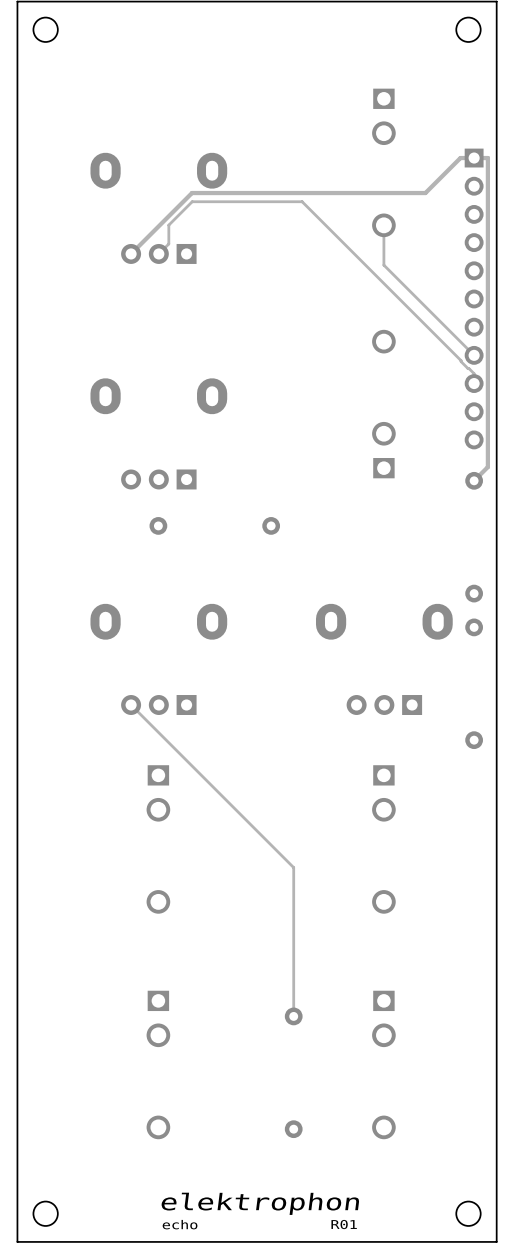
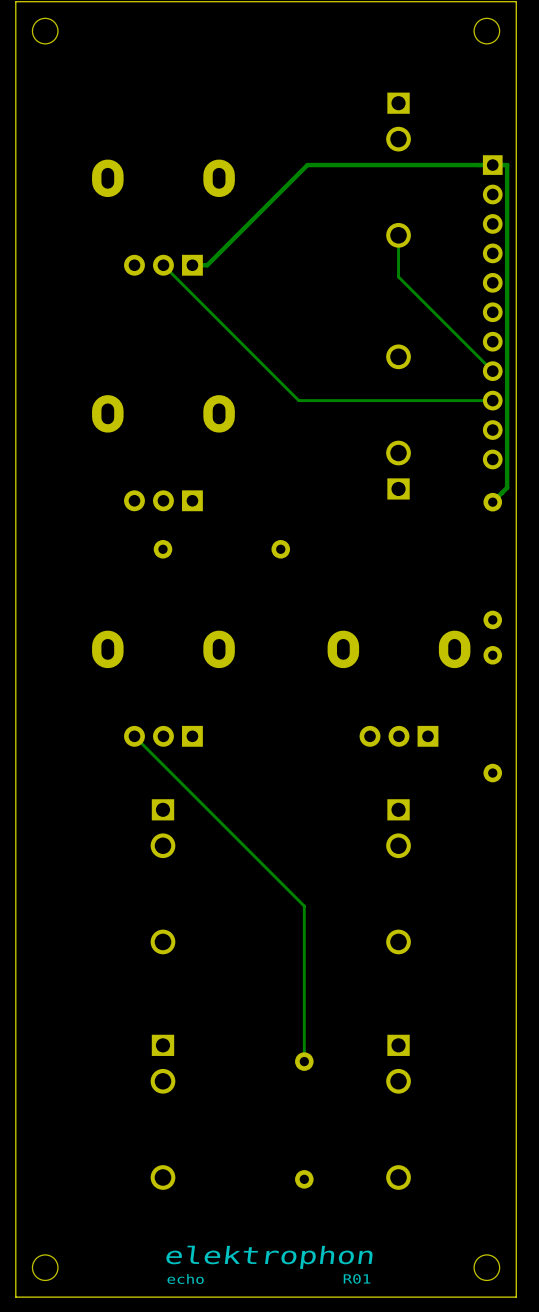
track: (460, 158) (425, 193) (192, 193) (131, 253) -> (478, 165) (307, 165) (207, 265) (192, 265)
track: (158, 253) (168, 243) (168, 225) (192, 201) (302, 201) (474, 373) (474, 383) -> (163, 265) (298, 400) (492, 400)

